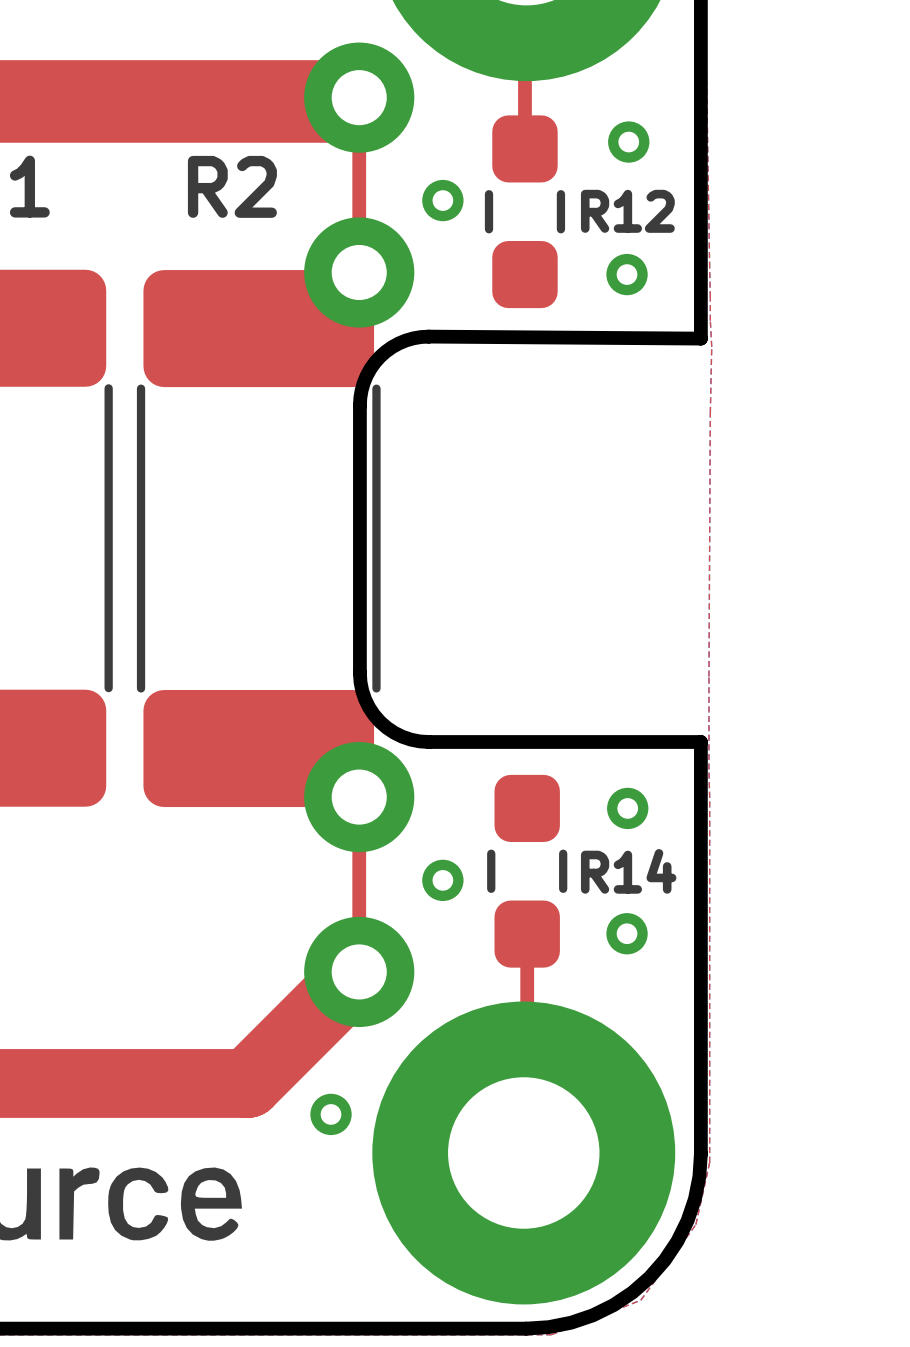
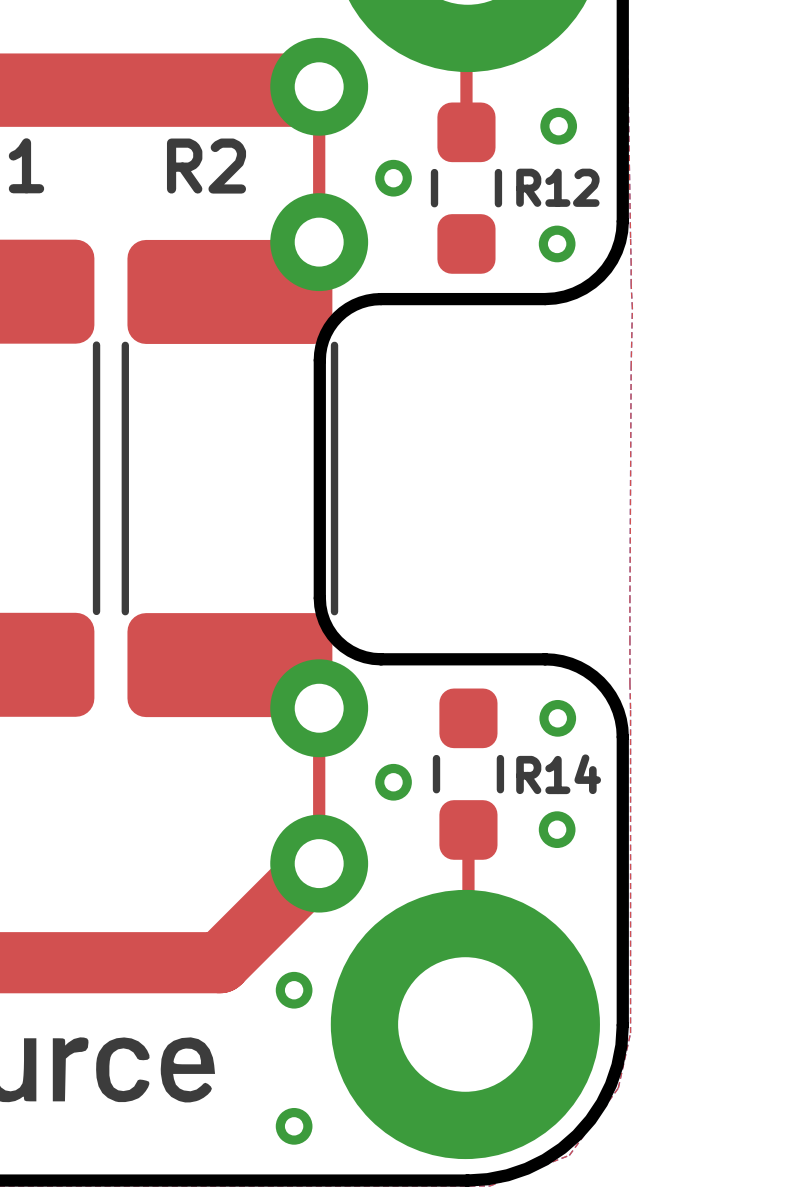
board edge: (700, 249) (700, 338) (428, 336) -> (622, 221) (620, 241) (606, 268) (583, 288) (565, 296) (545, 299) (380, 299)
board edge: (613, 742) (700, 742) (700, 829) -> (545, 659) (570, 663) (586, 671) (600, 682) (610, 695) (618, 711) (622, 736)
via: none -> (294, 1126)

